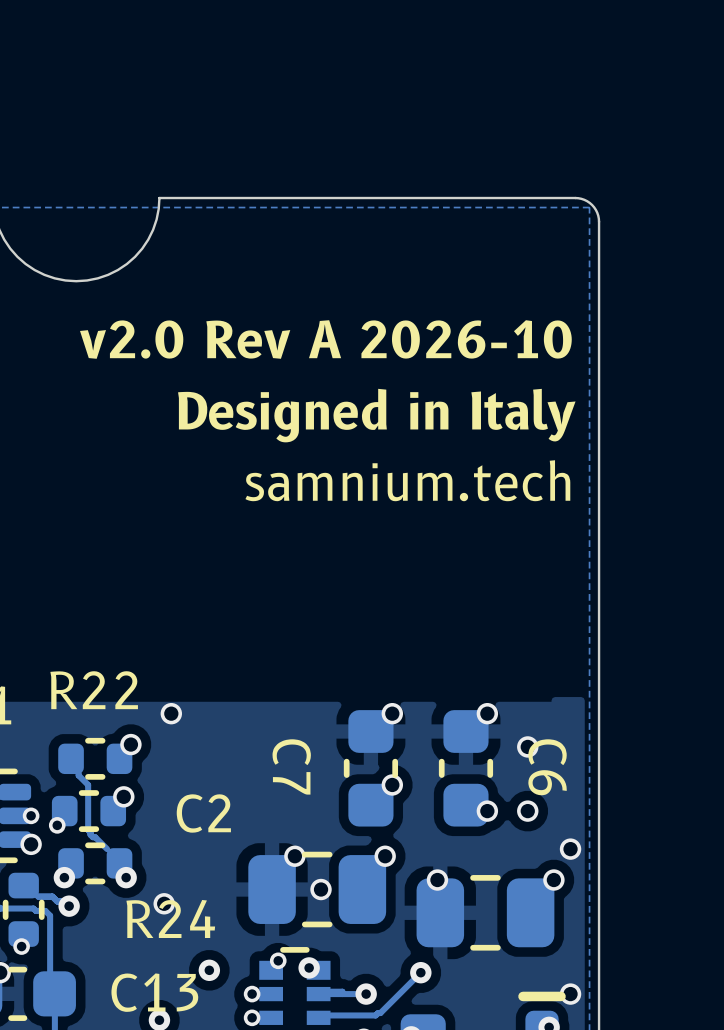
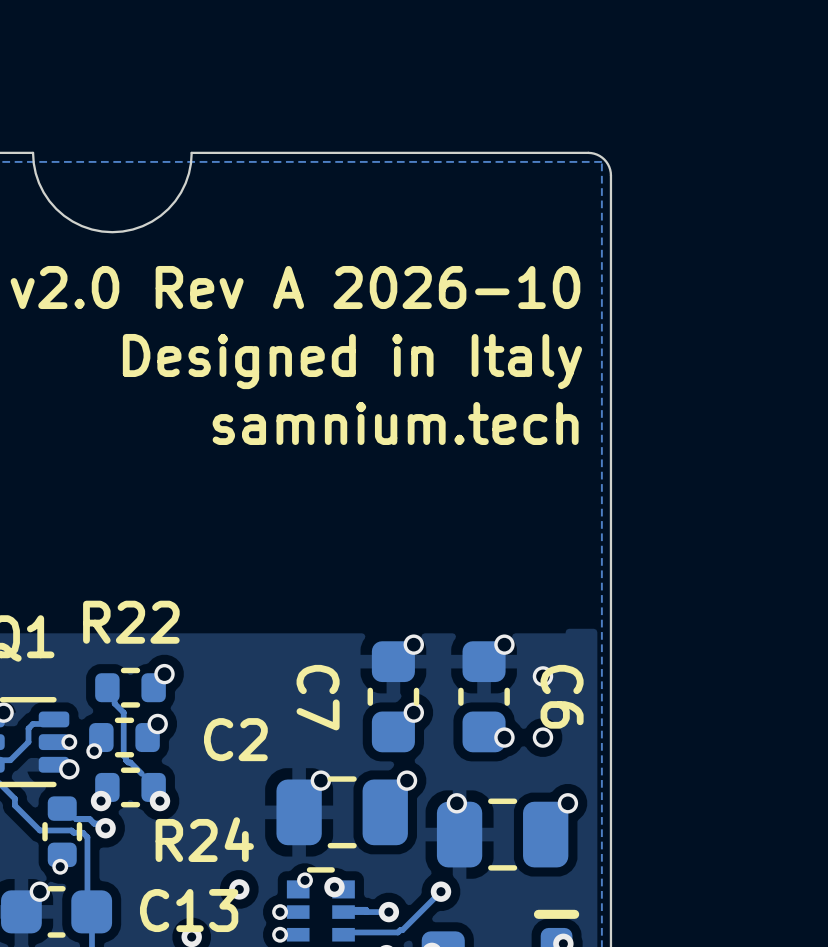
via: (171, 713) -> none
via: (570, 849) -> none
via: (321, 889) -> none
via: (164, 903) -> none
via: (570, 994) -> none

